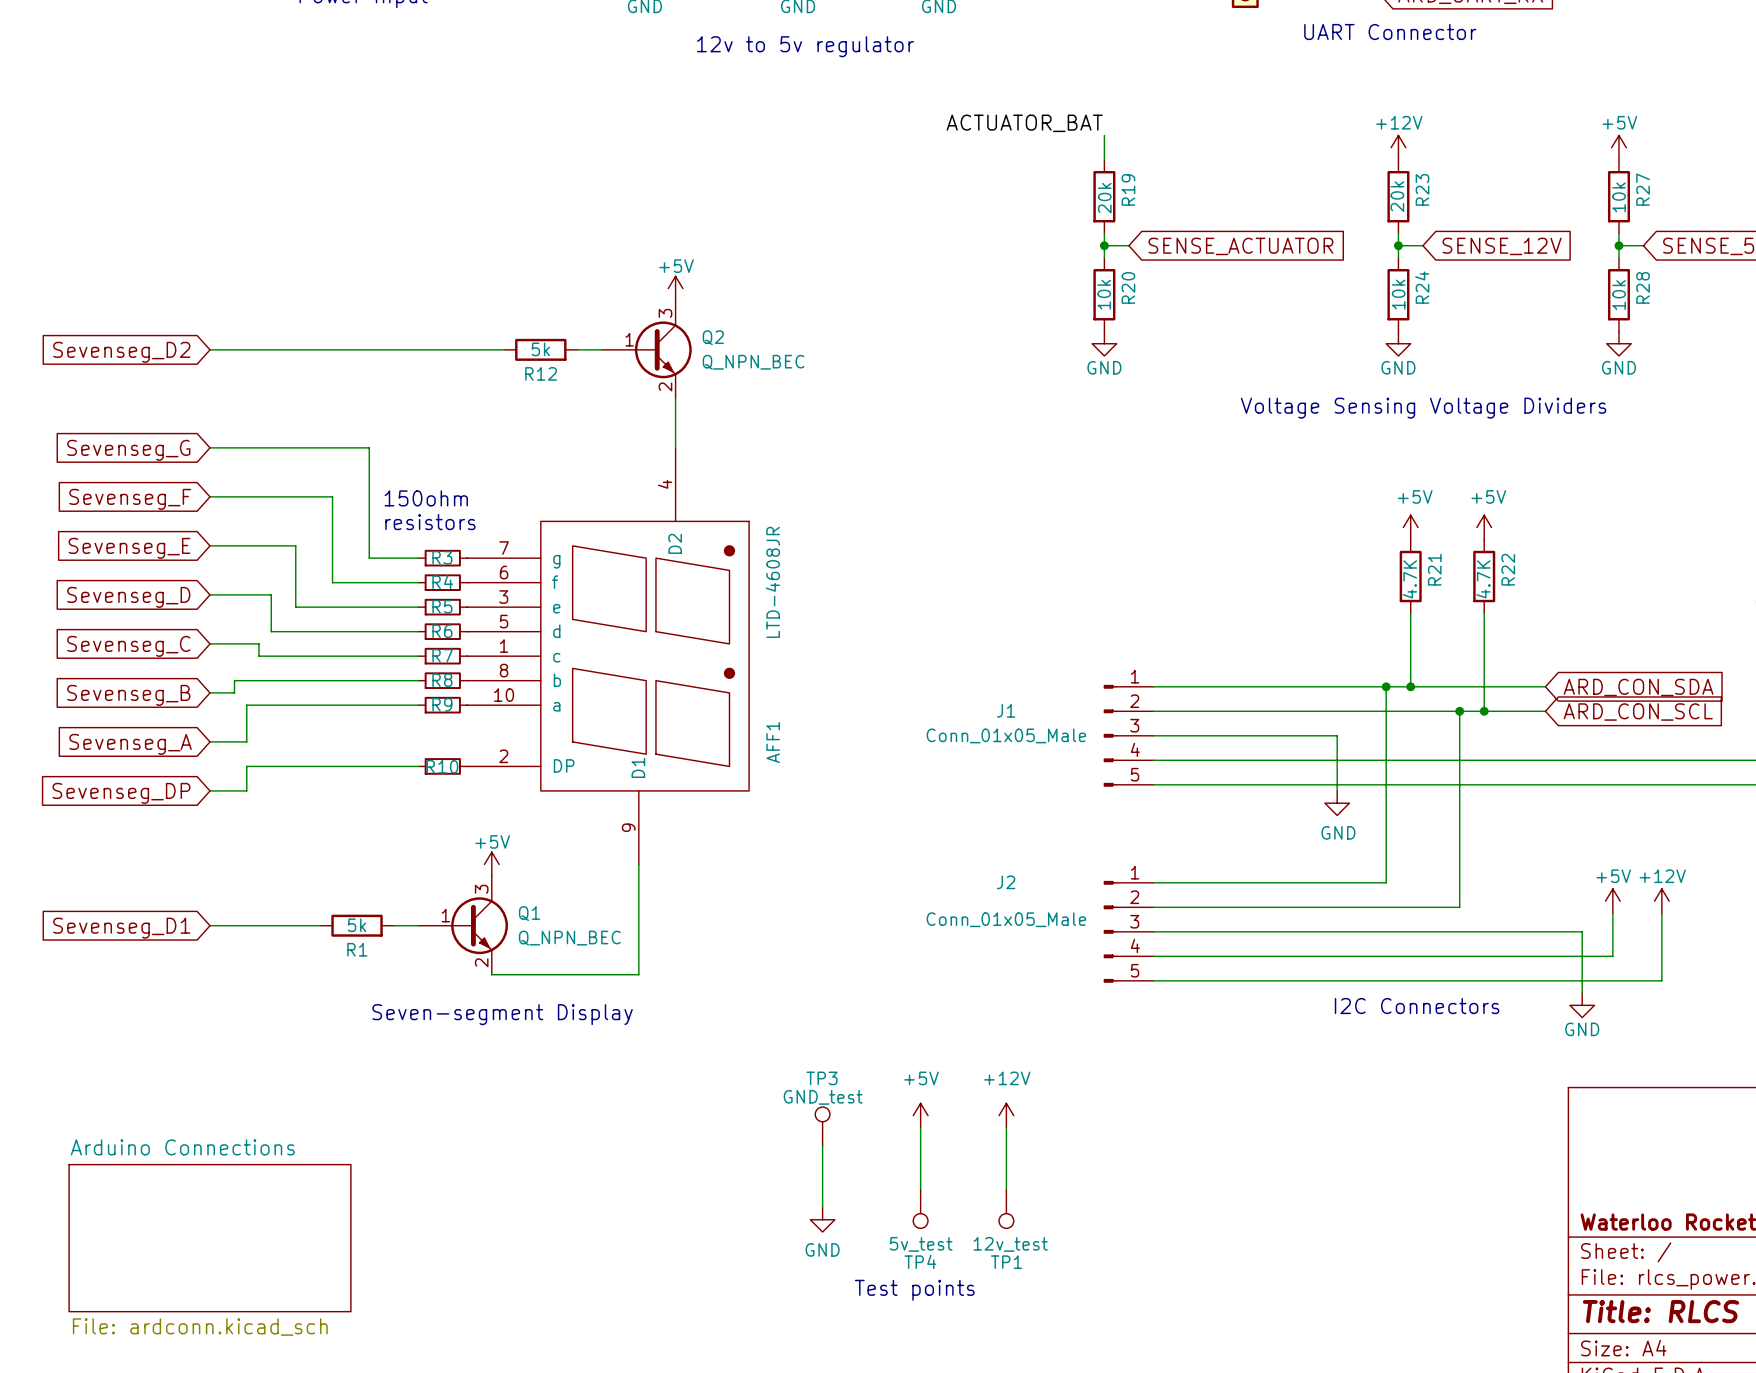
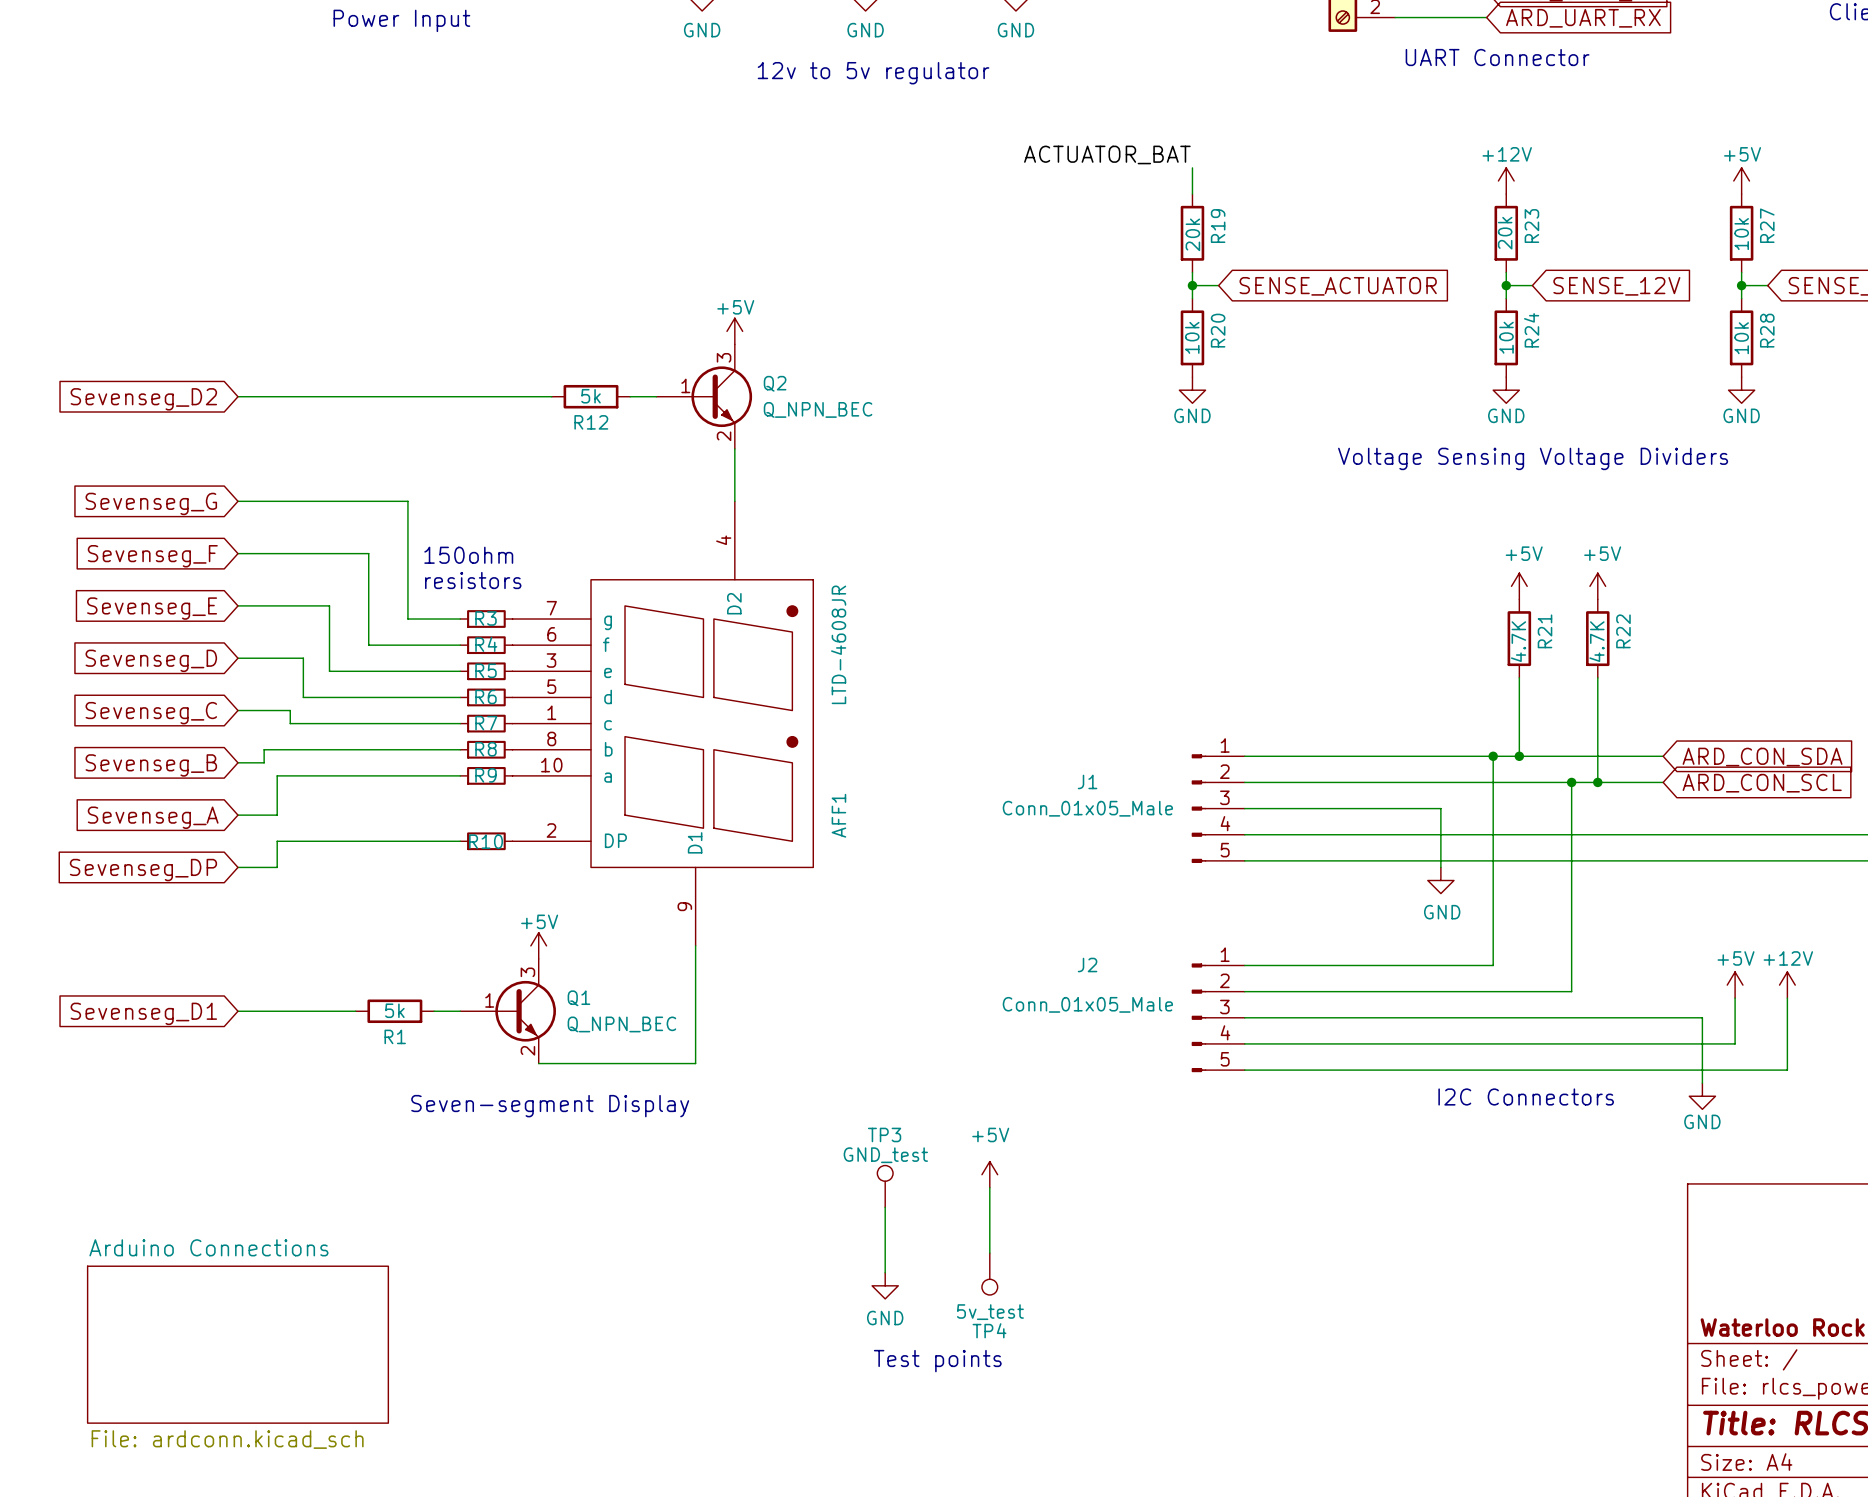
power symbol position: +5V (920, 1115) -> +5V (989, 1174)
power symbol: +12V (1006, 1115) -> none
TP3 position: (822, 1126) -> (885, 1186)
wire: (920, 1127) (920, 1189) -> (989, 1187) (989, 1253)
wire: (1006, 1127) (1006, 1189) -> none
wire: (822, 1146) (822, 1207) -> (885, 1207) (885, 1272)
TP4 position: (920, 1208) -> (989, 1274)
TP1: 12v_test (1006, 1208) -> none
power symbol position: GND (822, 1219) -> GND (885, 1285)
text position: Test points (914, 1290) -> Test points (937, 1361)

